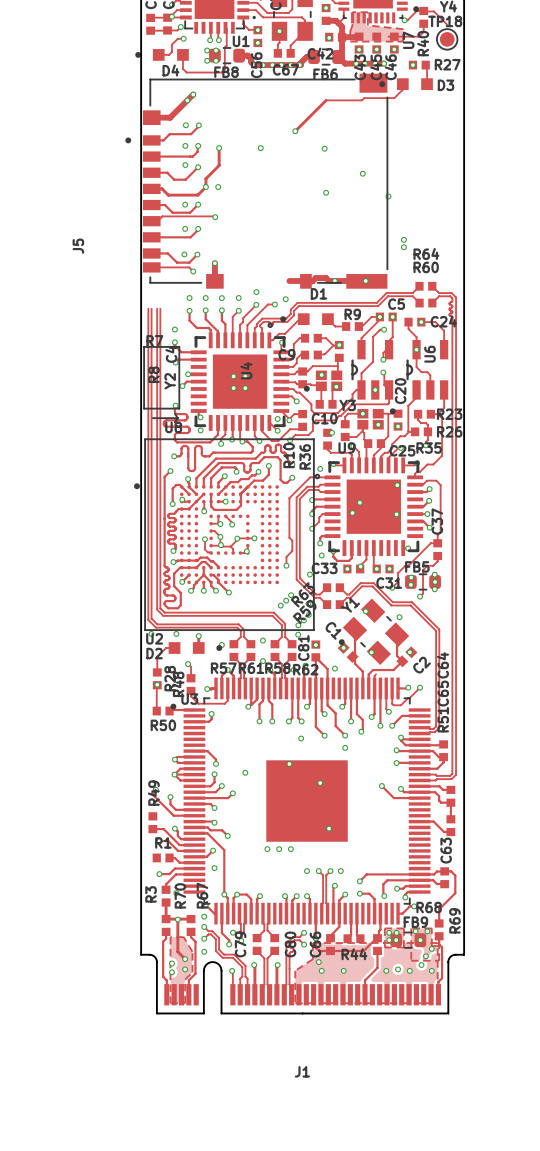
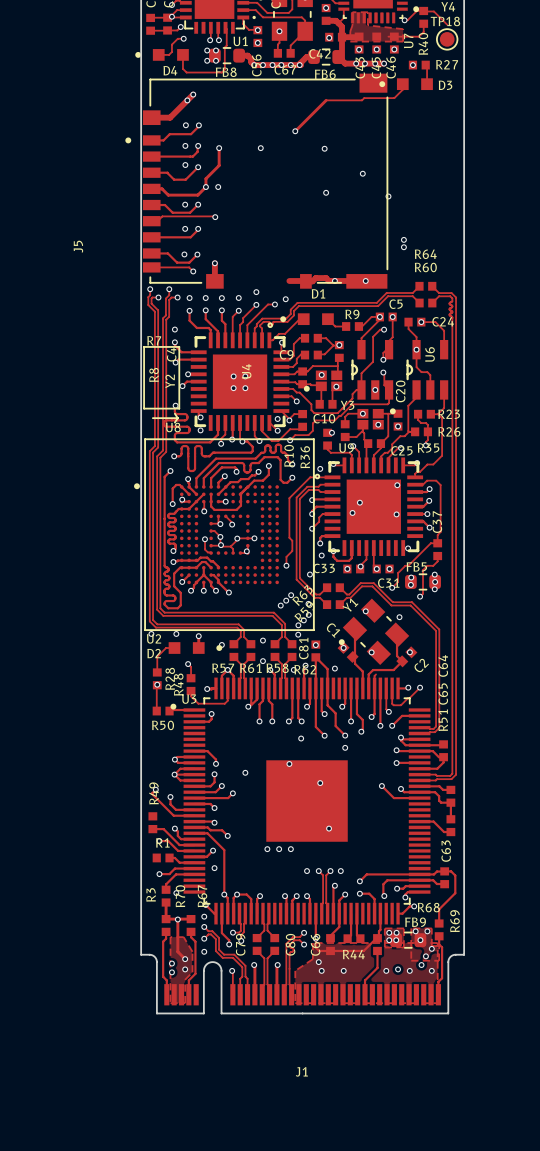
via: none -> (150, 289)
via: none -> (169, 289)
via: none -> (158, 297)
via: none -> (177, 297)
track: (148, 308) (149, 621) -> (150, 289) (148, 305) (154, 311) (154, 446) (149, 451) (149, 621)
track: (151, 308) (153, 620) -> (158, 297) (151, 298) (151, 303) (158, 310) (158, 447) (153, 452) (153, 620)
track: (157, 308) (157, 456) -> (169, 289) (169, 295) (165, 298) (165, 315) (163, 318) (163, 450) (157, 456)
track: (160, 308) (160, 457) -> (177, 297) (171, 297) (169, 299) (169, 316) (166, 319) (166, 451) (160, 457)

